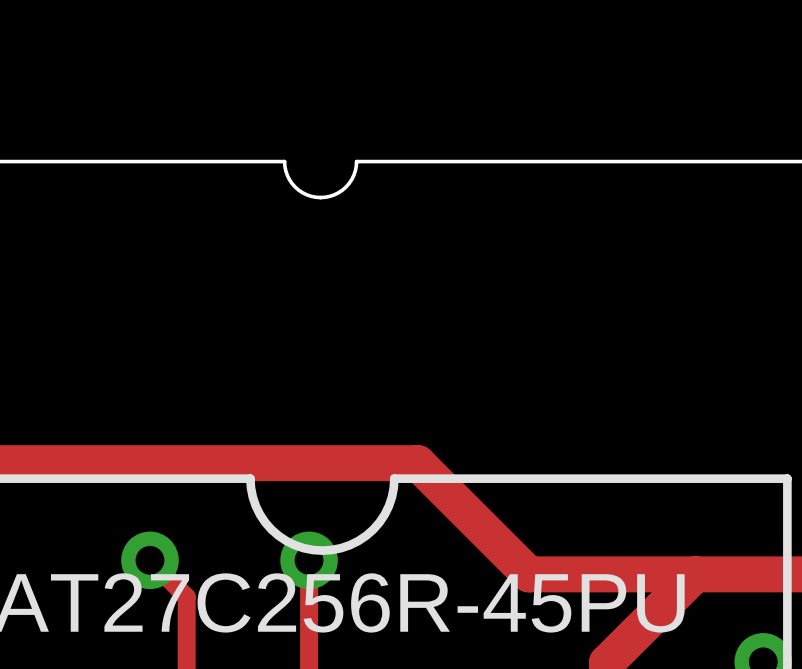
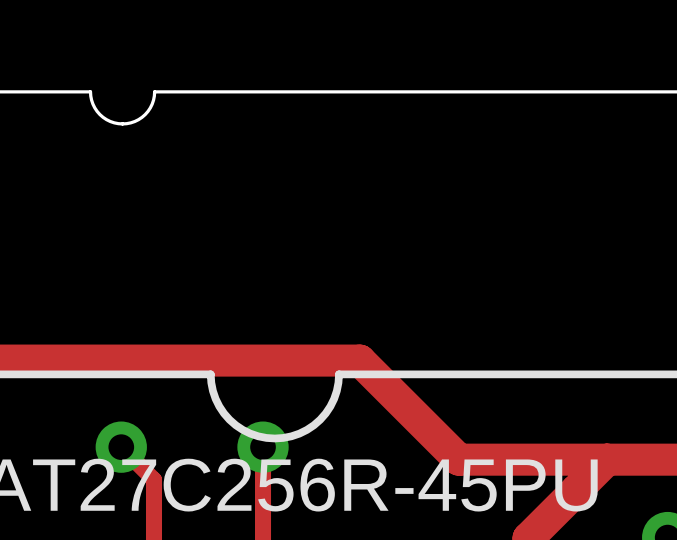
board edge: (115, 161) (187, 161) -> (90, 91) (92, 104) (99, 114) (110, 121) (122, 123) (134, 121) (145, 114) (152, 104) (154, 91)
board edge: (284, 161) (287, 175) (295, 187) (306, 194) (320, 197) (334, 194) (346, 187) (353, 175) (356, 161) -> (241, 91) (305, 91)

